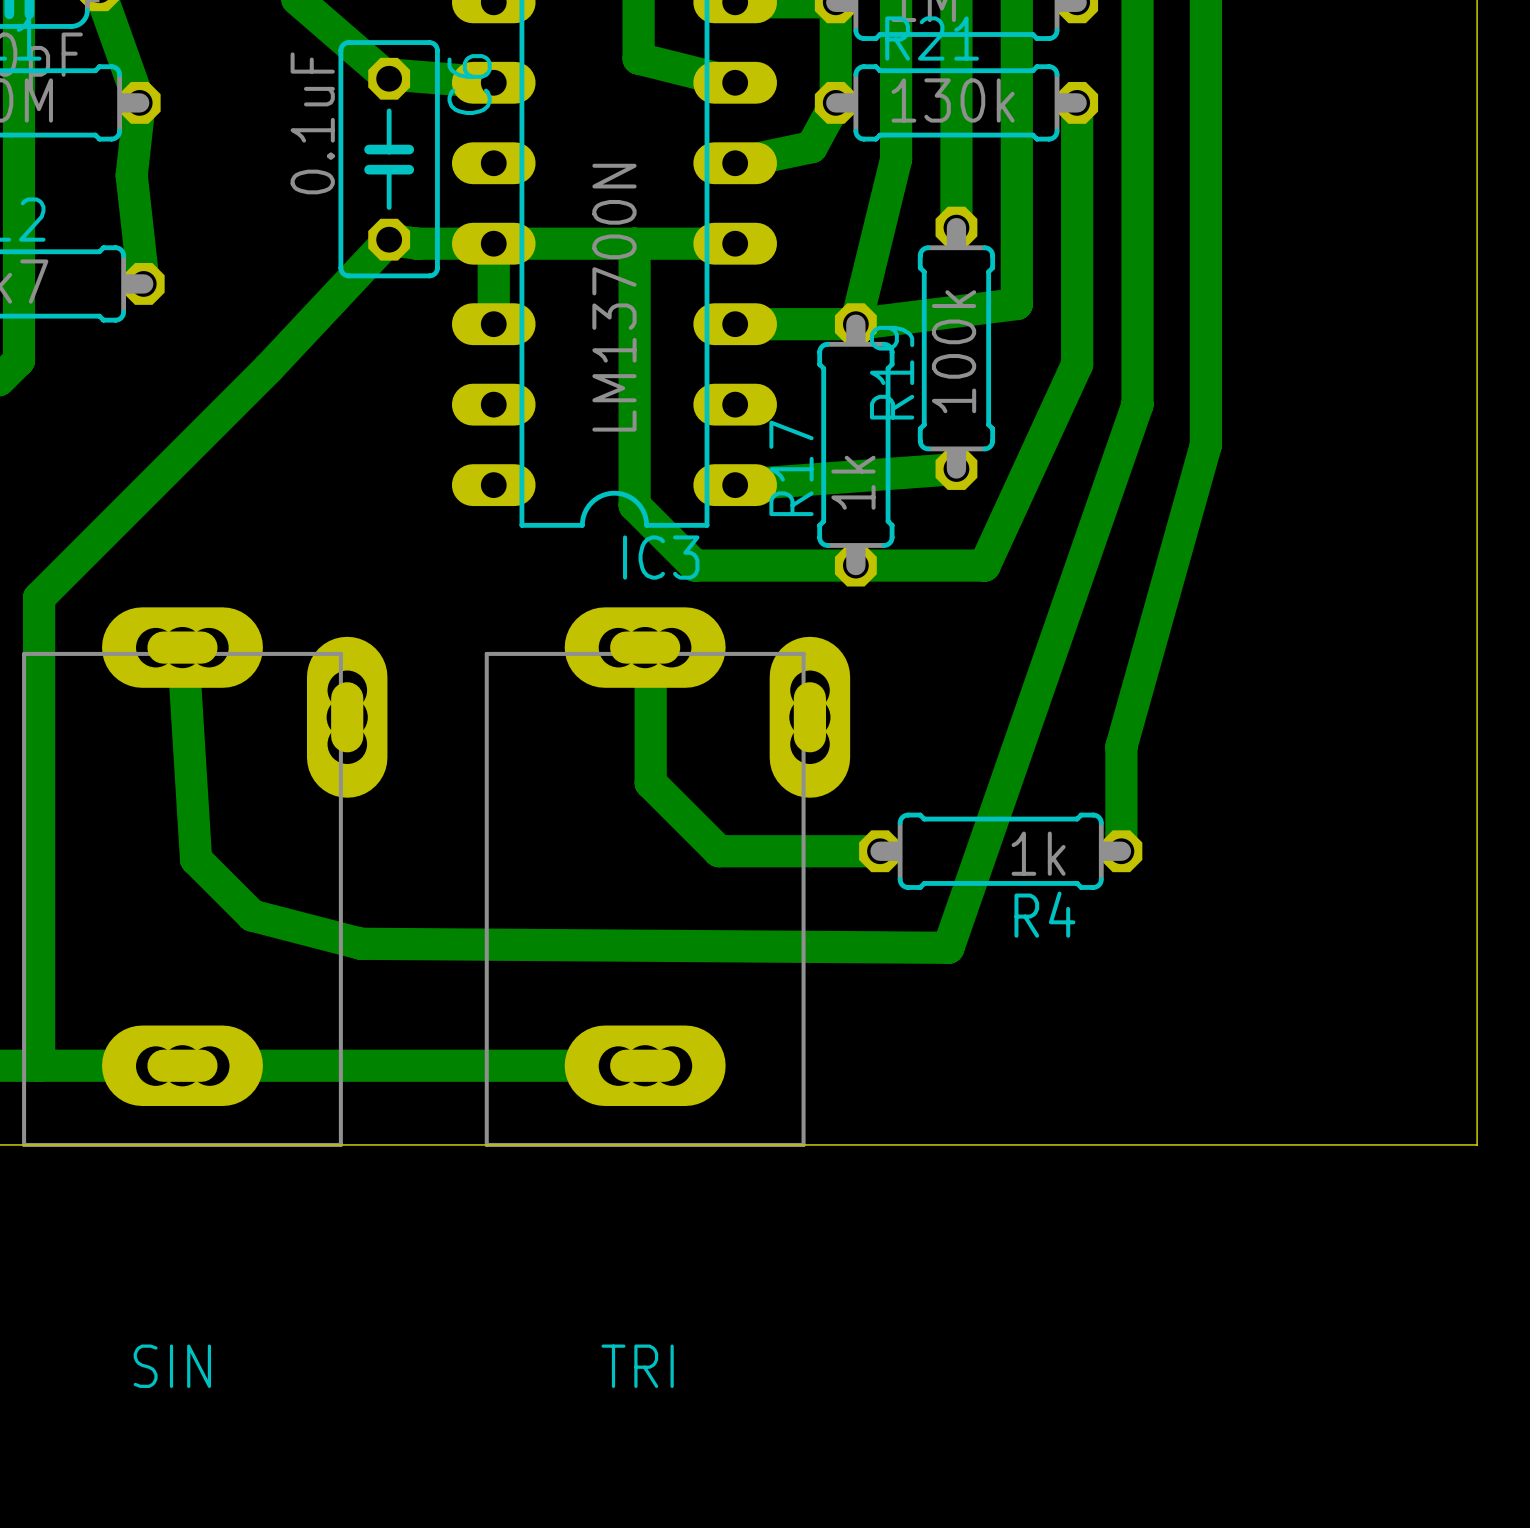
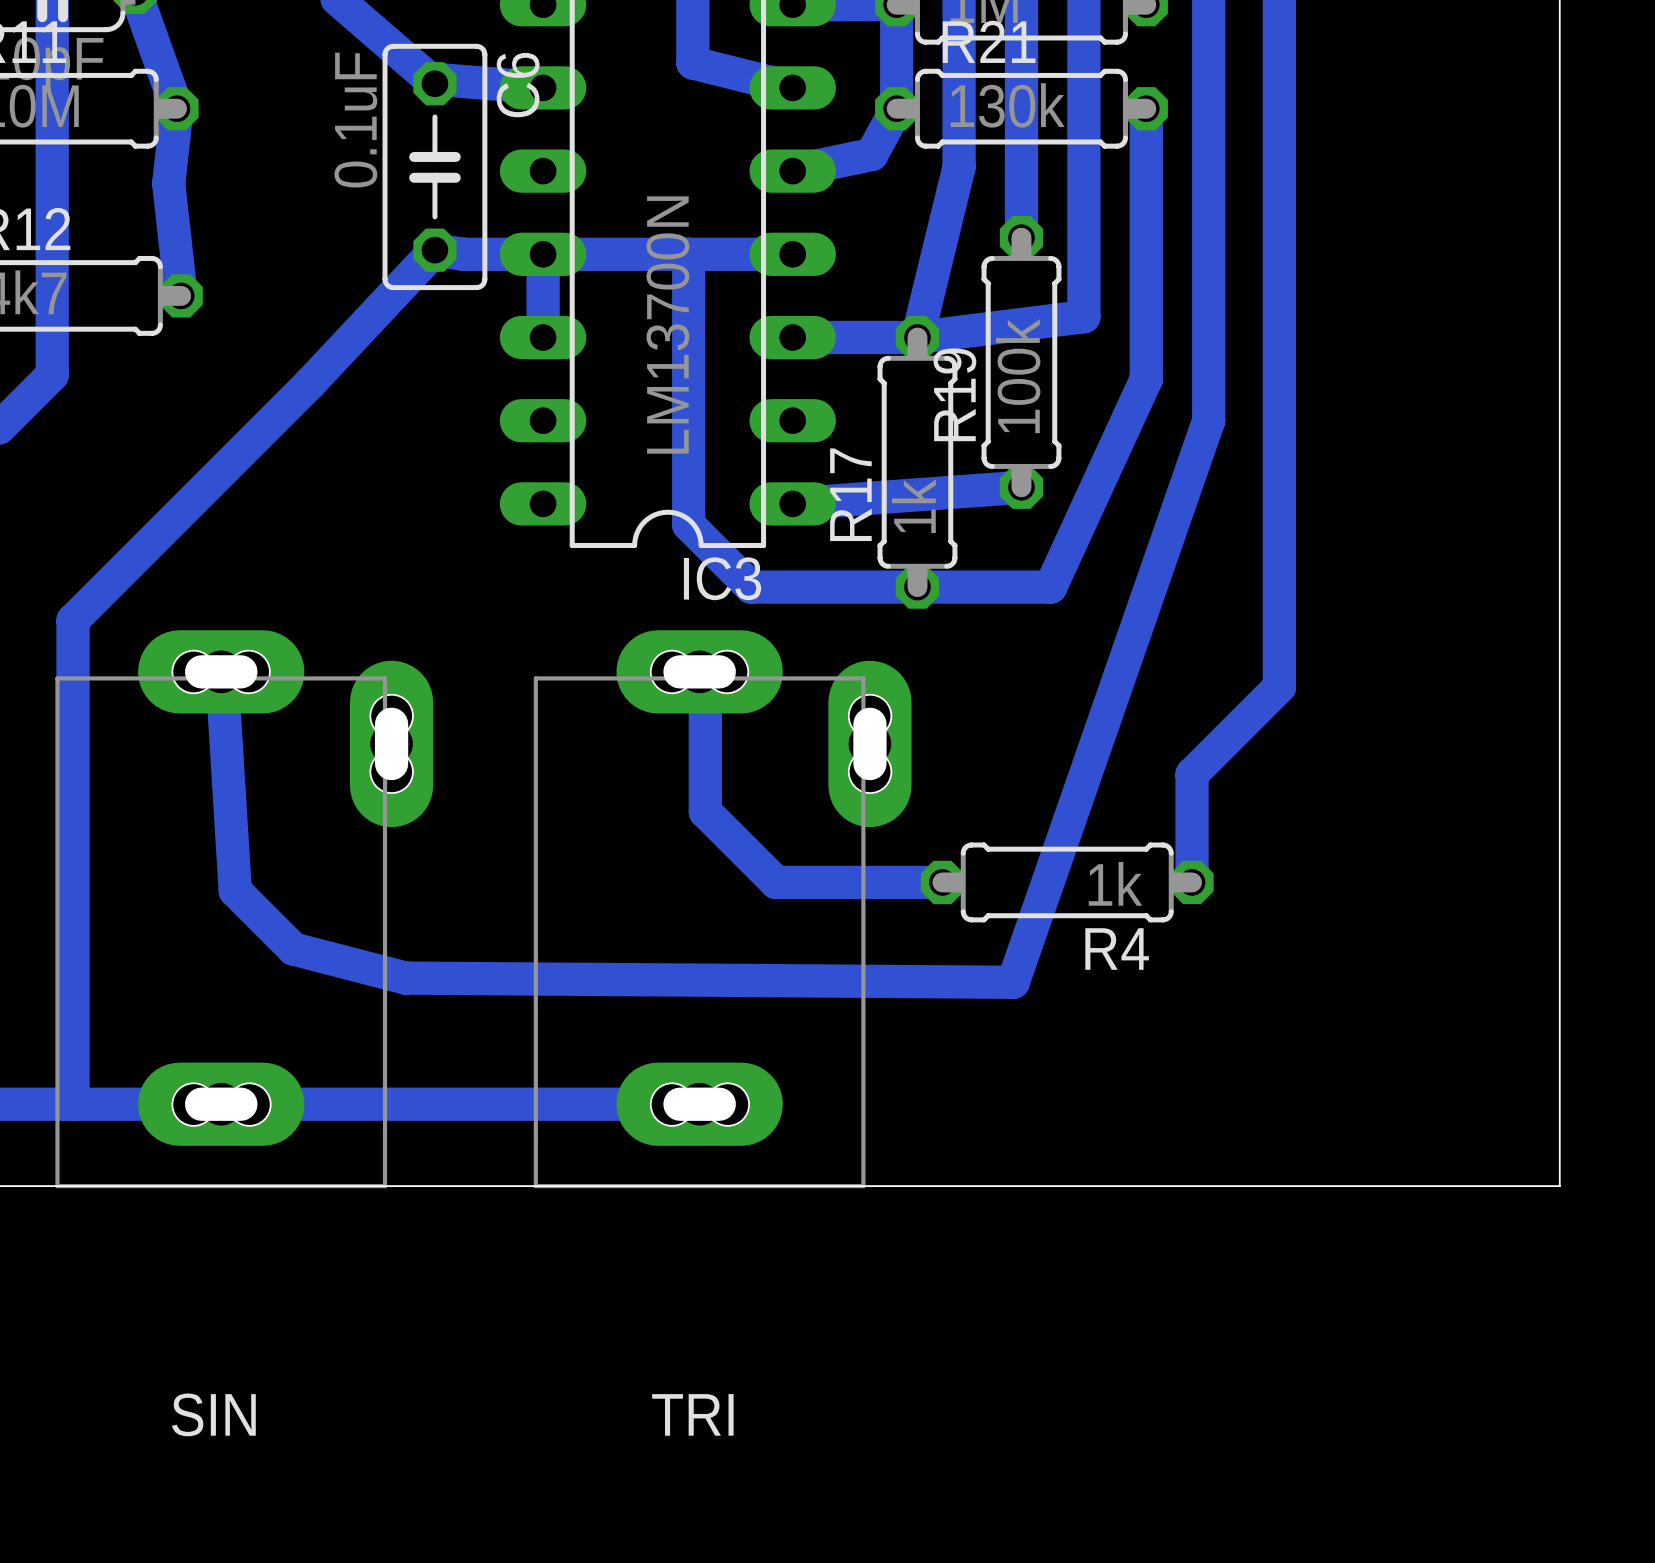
bottom track: (1205, 444) (1121, 746) -> (1279, 462) (1279, 686) (1192, 774)

